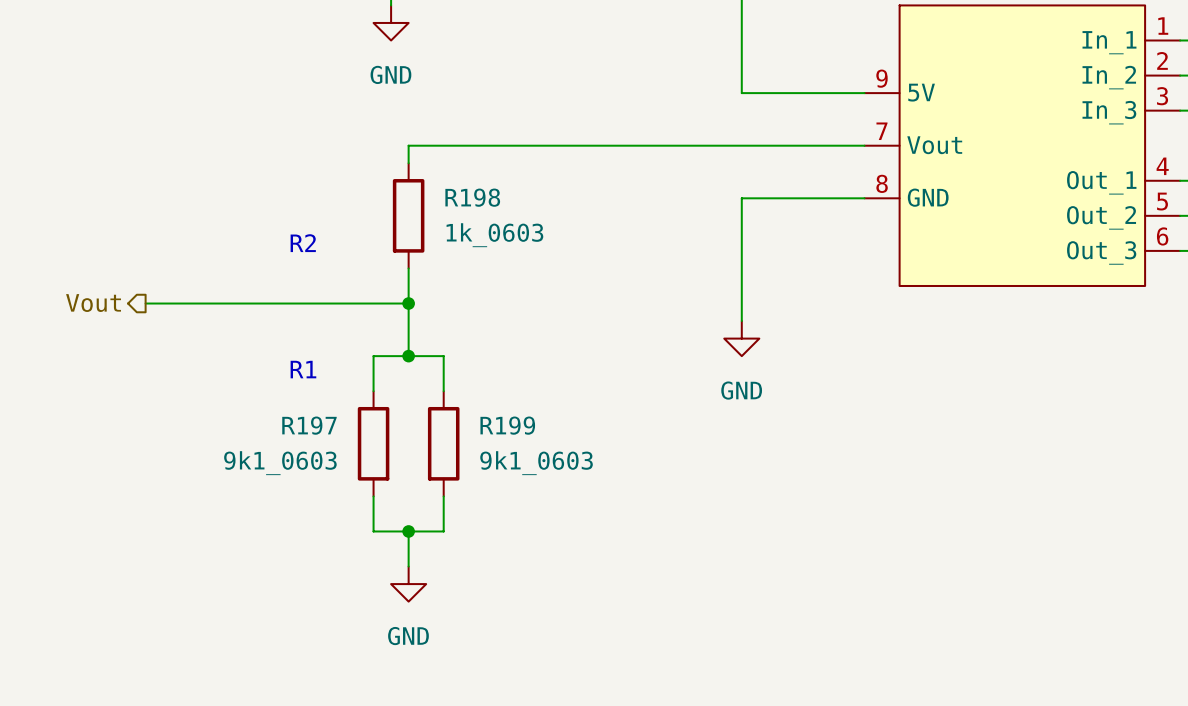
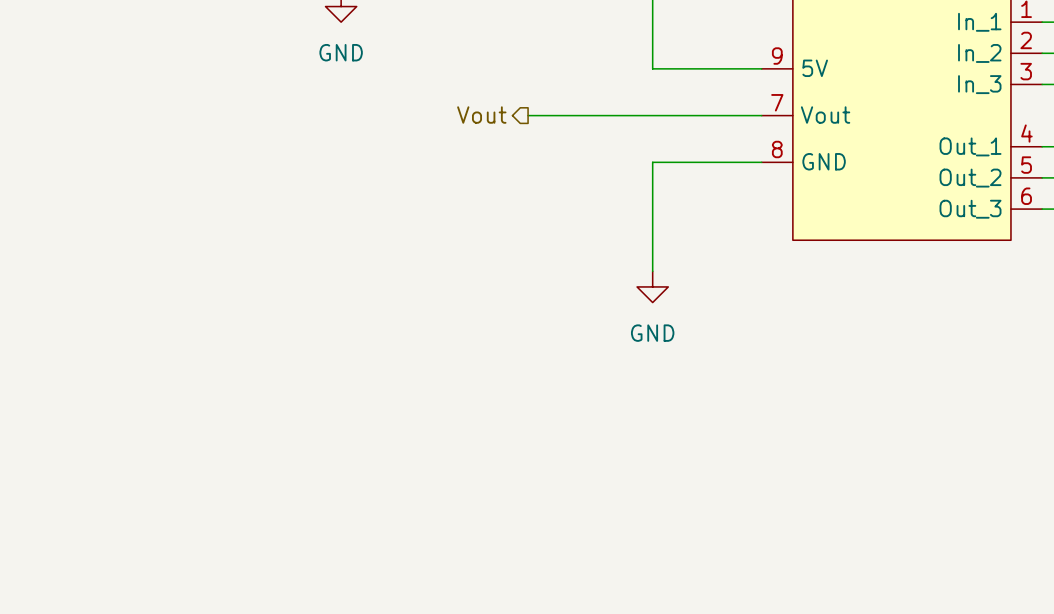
hierarchical label: none -> Vout (481, 115)
wire: (601, 145) (408, 145) (408, 163) -> none
R198: 1k_0603 (408, 215) -> none
text: R2 (303, 243) -> none
wire: (408, 268) (408, 356) -> none
hierarchical label: Vout (93, 303) -> none
wire: (145, 303) (408, 303) -> none
junction: (408, 303) -> none
junction: (408, 356) -> none
text: R1 (303, 369) -> none
wire: (373, 391) (373, 356) (443, 356) (443, 391) -> none
R197: 9k1_0603 (373, 443) -> none
R199: 9k1_0603 (443, 443) -> none
wire: (373, 496) (373, 531) (443, 531) (443, 496) -> none
wire: (408, 531) (408, 566) -> none
junction: (408, 531) -> none
power symbol: GND (408, 584) -> none

